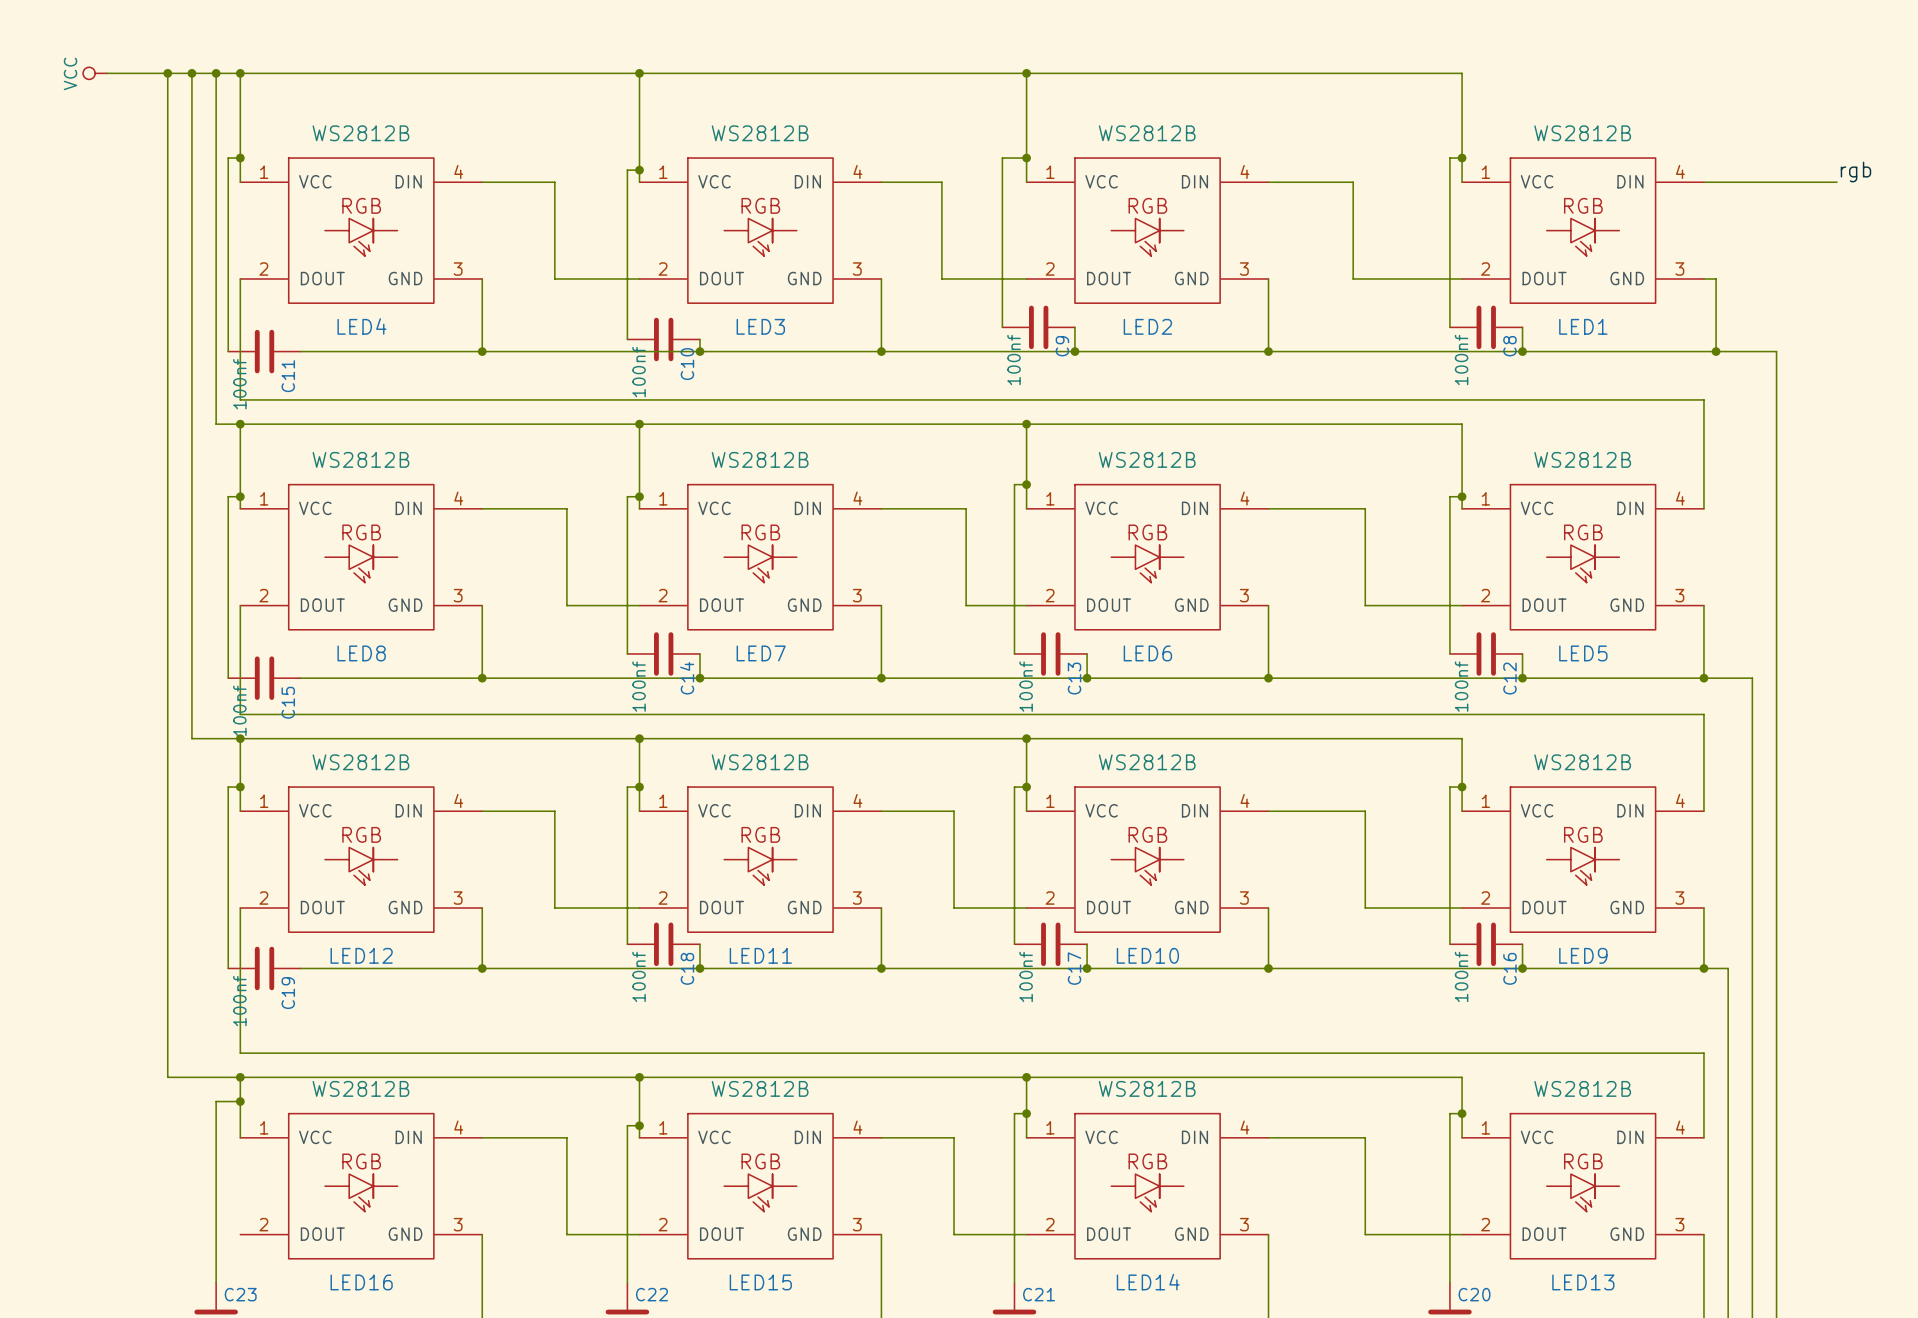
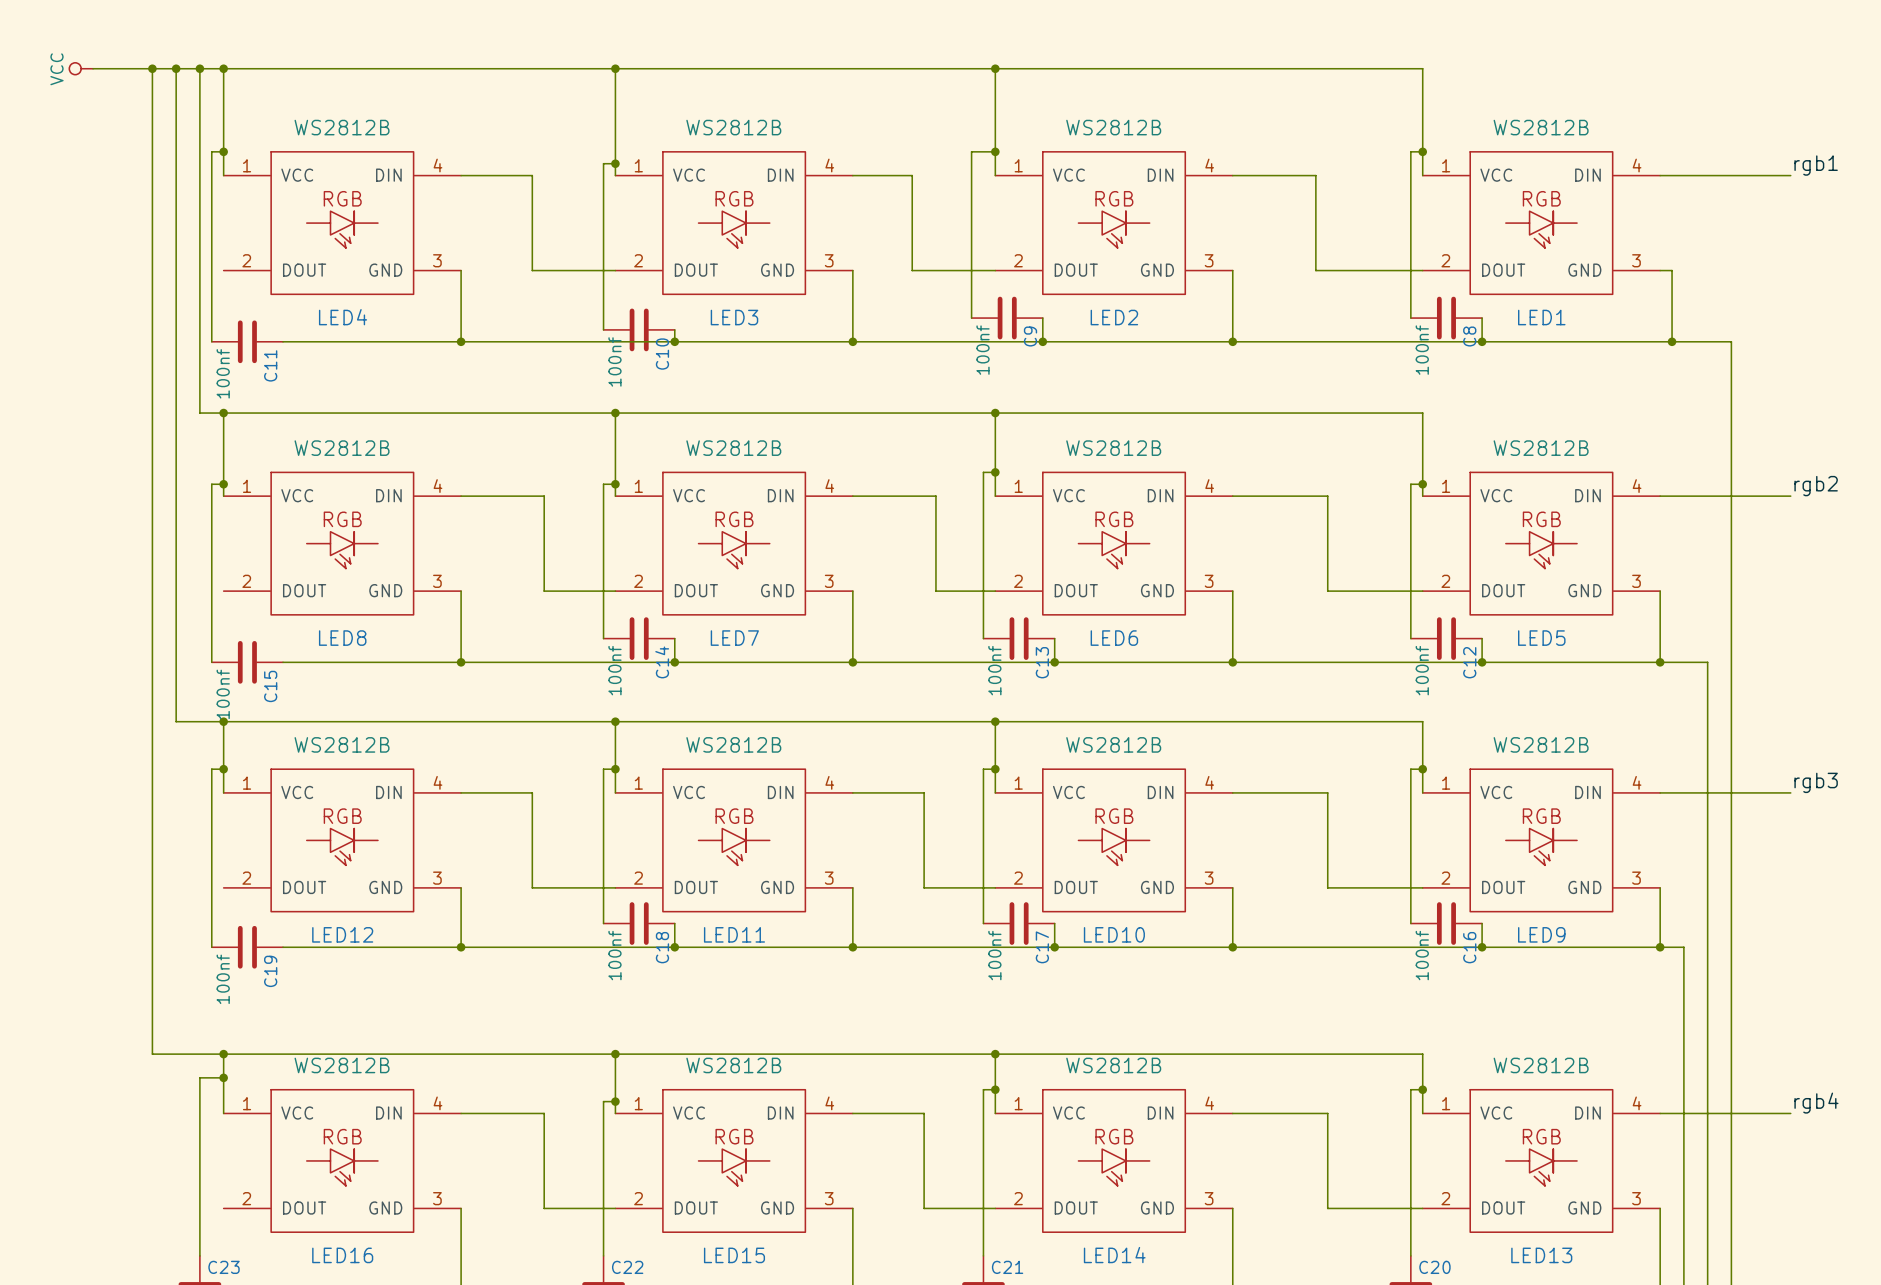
label: rgb (1855, 171) -> rgb1 (1816, 165)
wire: (240, 278) (240, 399) (1703, 399) (1703, 508) -> (1790, 496) (1660, 496)
label: none -> rgb2 (1816, 486)
wire: (240, 605) (240, 714) (1703, 714) (1703, 811) -> (1790, 792) (1660, 792)
label: none -> rgb3 (1816, 782)
wire: (240, 908) (240, 1053) (1703, 1053) (1703, 1137) -> (1790, 1113) (1660, 1113)
label: none -> rgb4 (1816, 1103)

